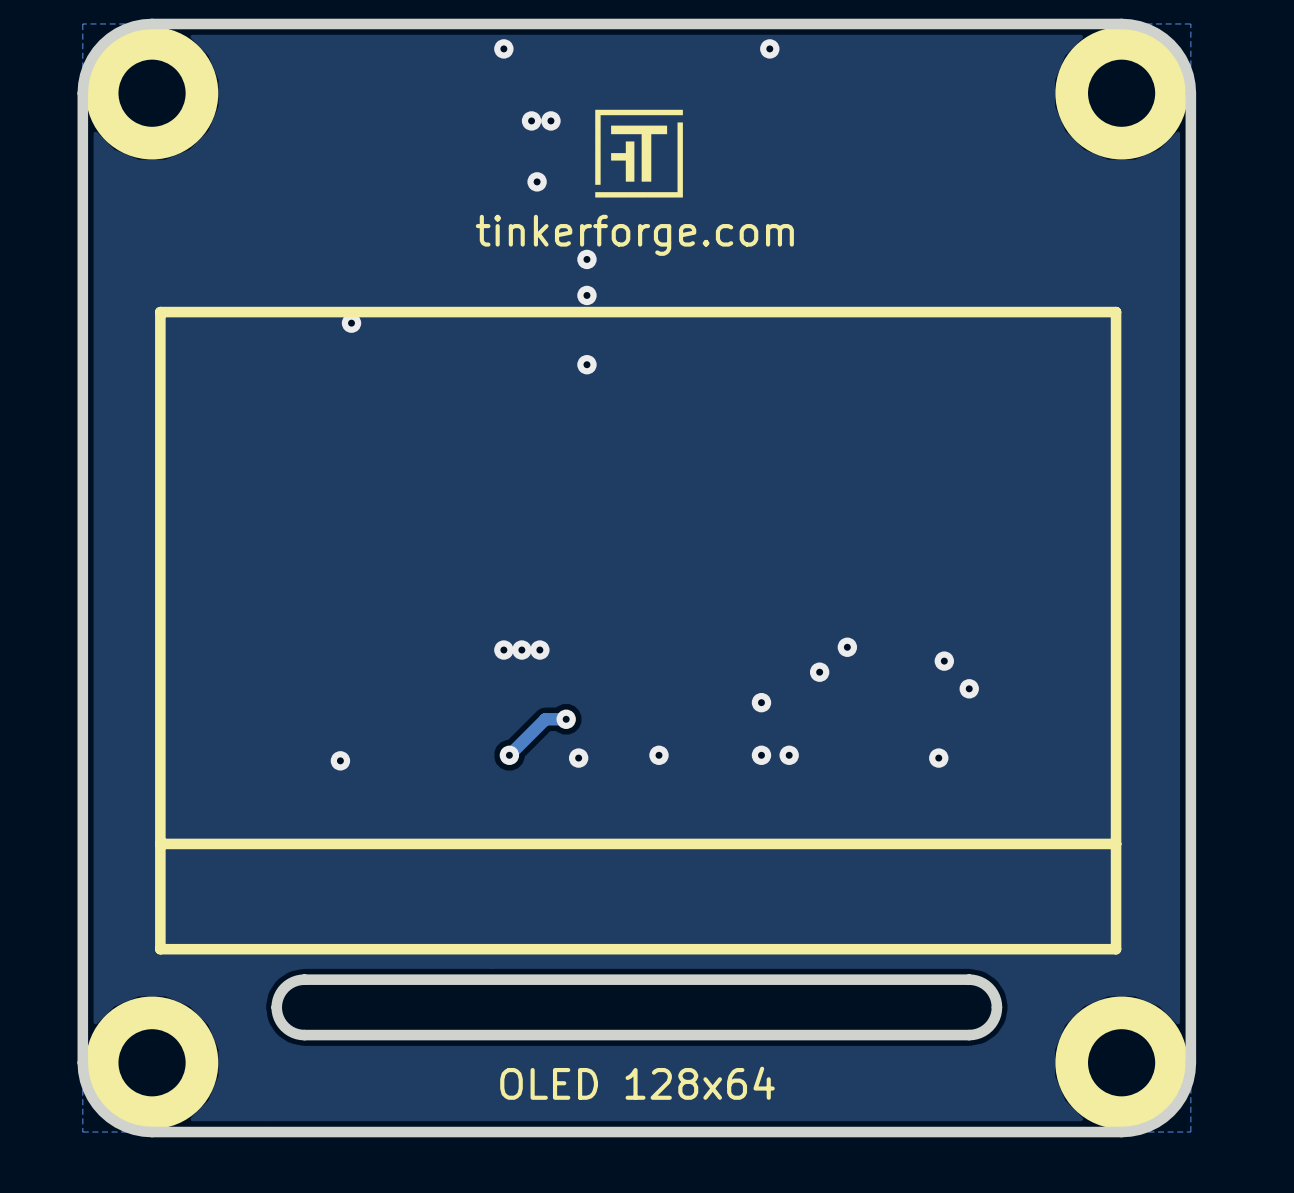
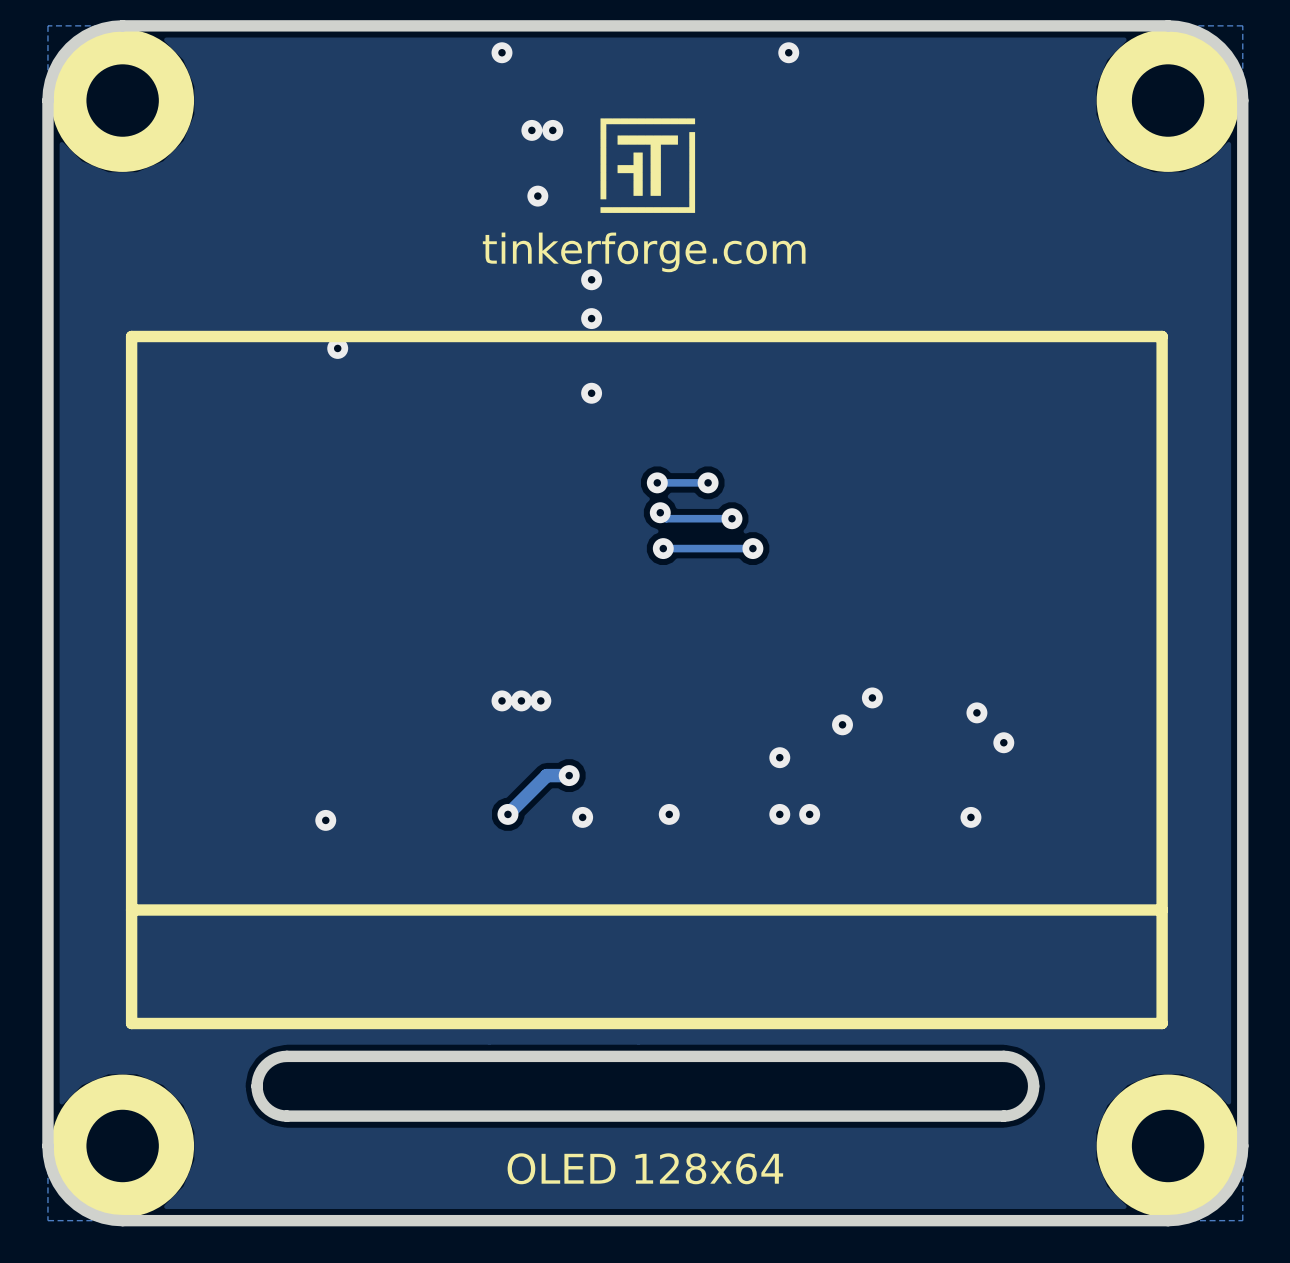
via: none -> (657, 482)
track: none -> (708, 482) (657, 482)
via: none -> (708, 482)
track: none -> (660, 512) (666, 518) (731, 518)
via: none -> (660, 512)
via: none -> (731, 518)
via: none -> (663, 548)
track: none -> (752, 548) (663, 548)
via: none -> (752, 548)

